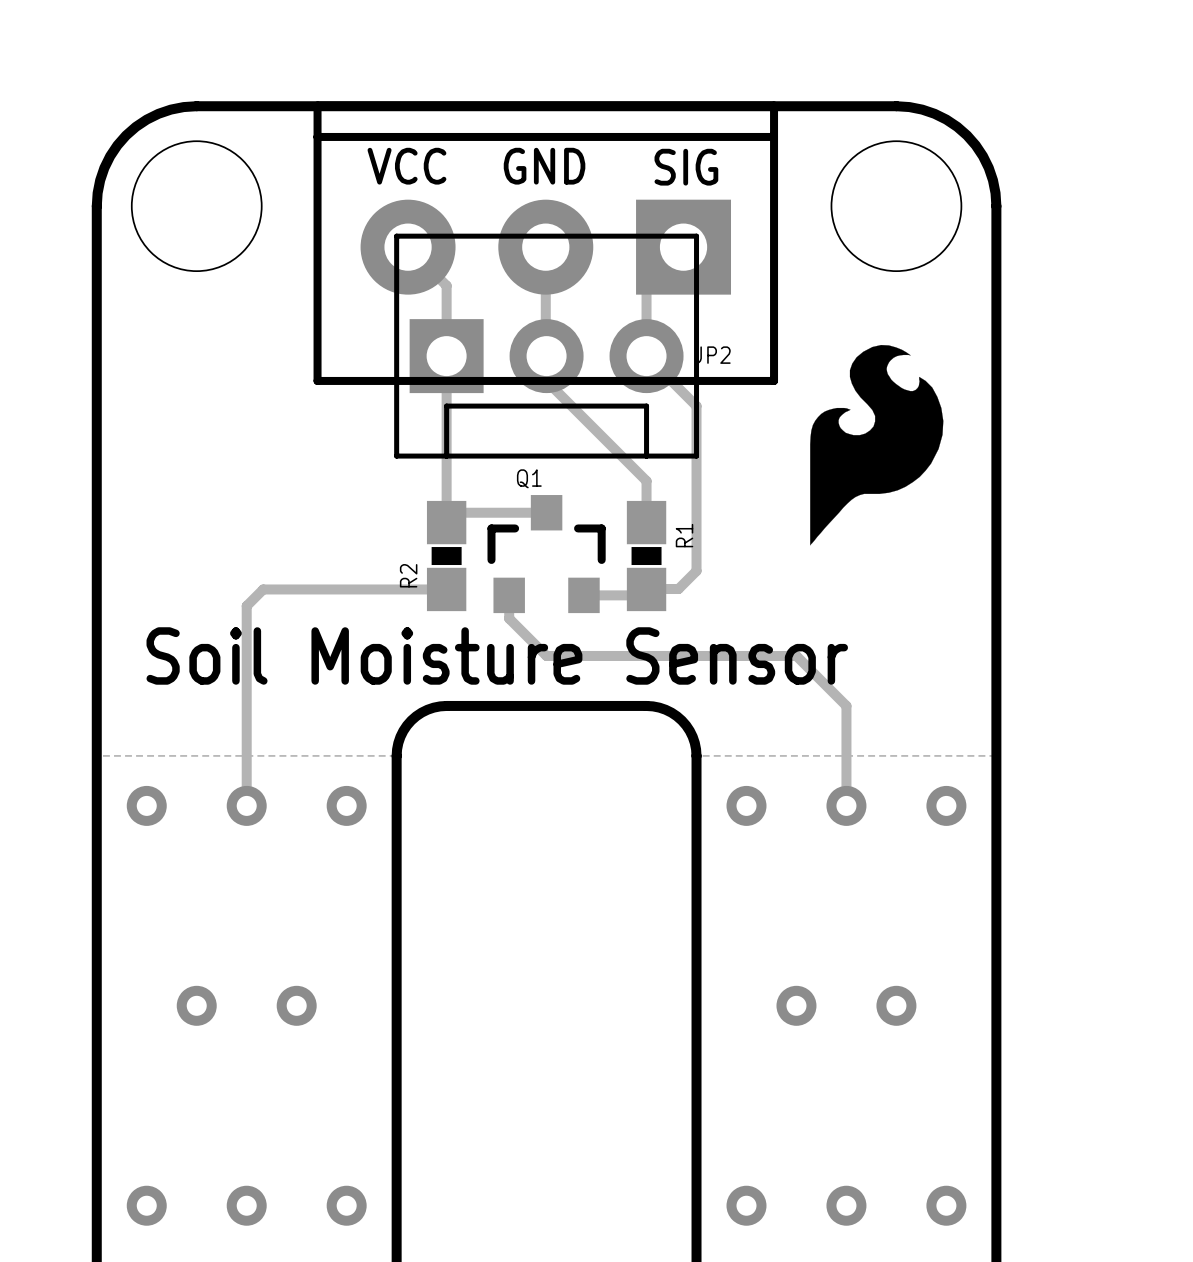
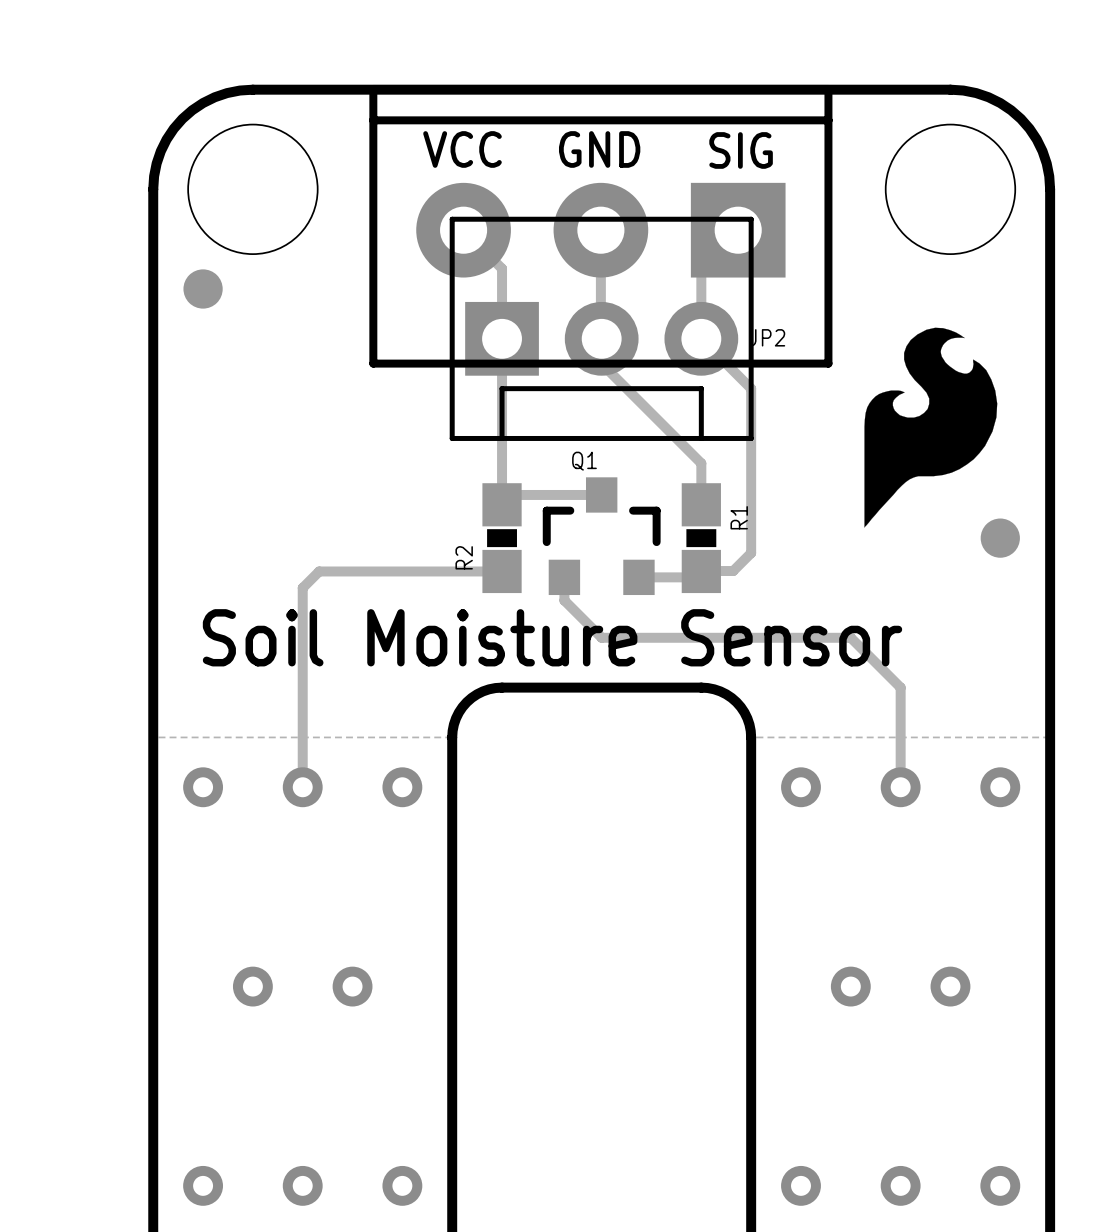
part: none -> (203, 288)
part: none -> (1000, 538)

